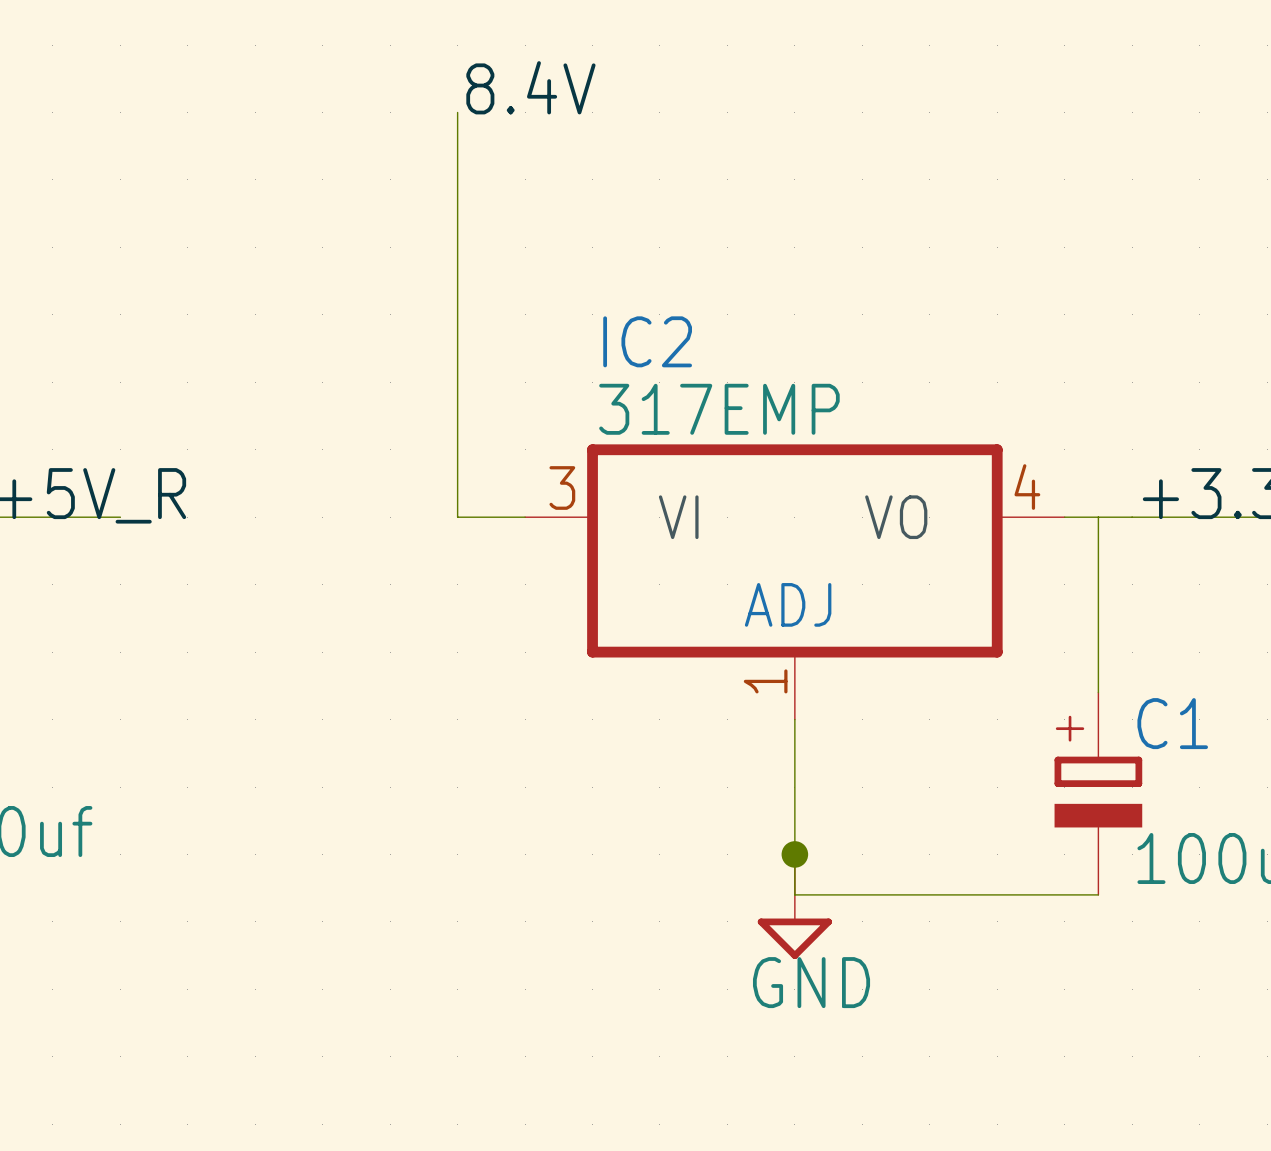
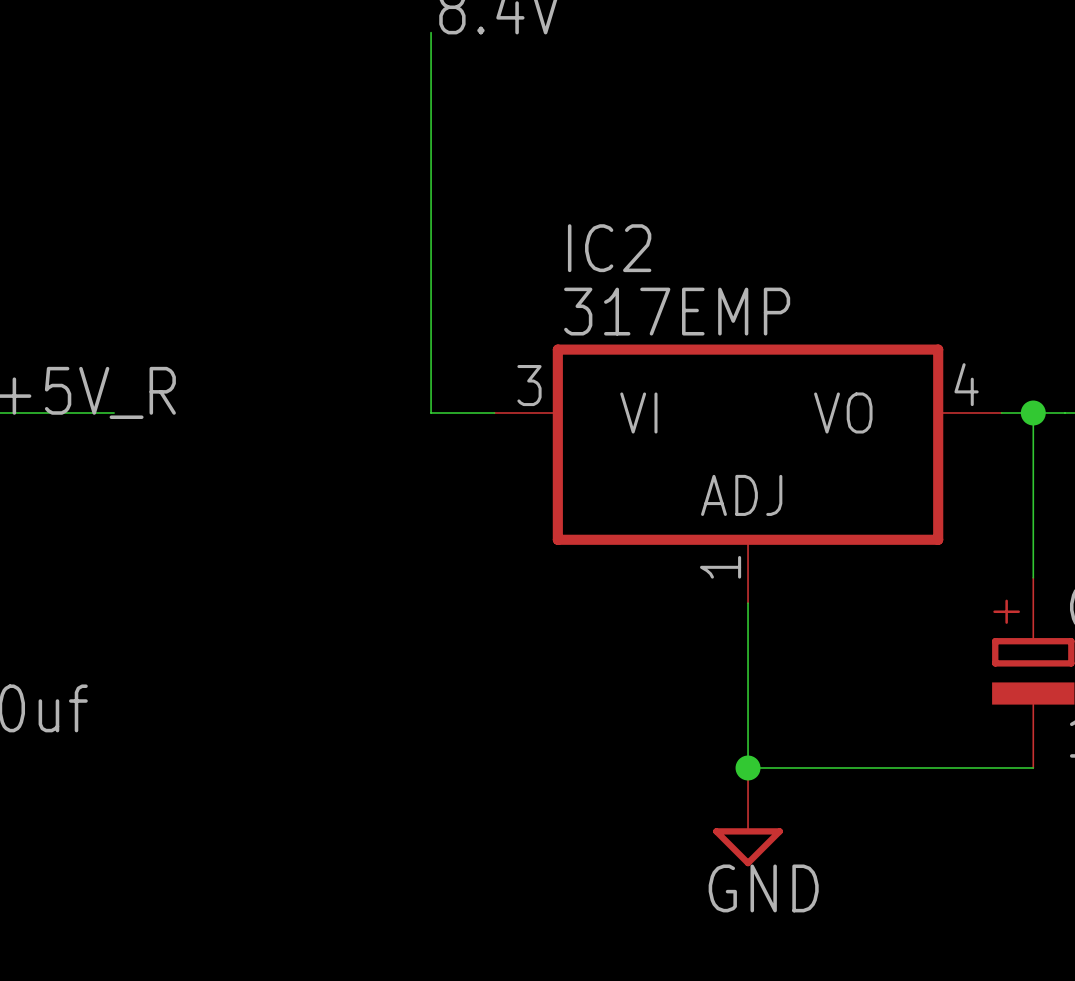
junction: none -> (1033, 412)
junction position: (794, 854) -> (748, 767)
power symbol position: GND (794, 906) -> GND (748, 817)

